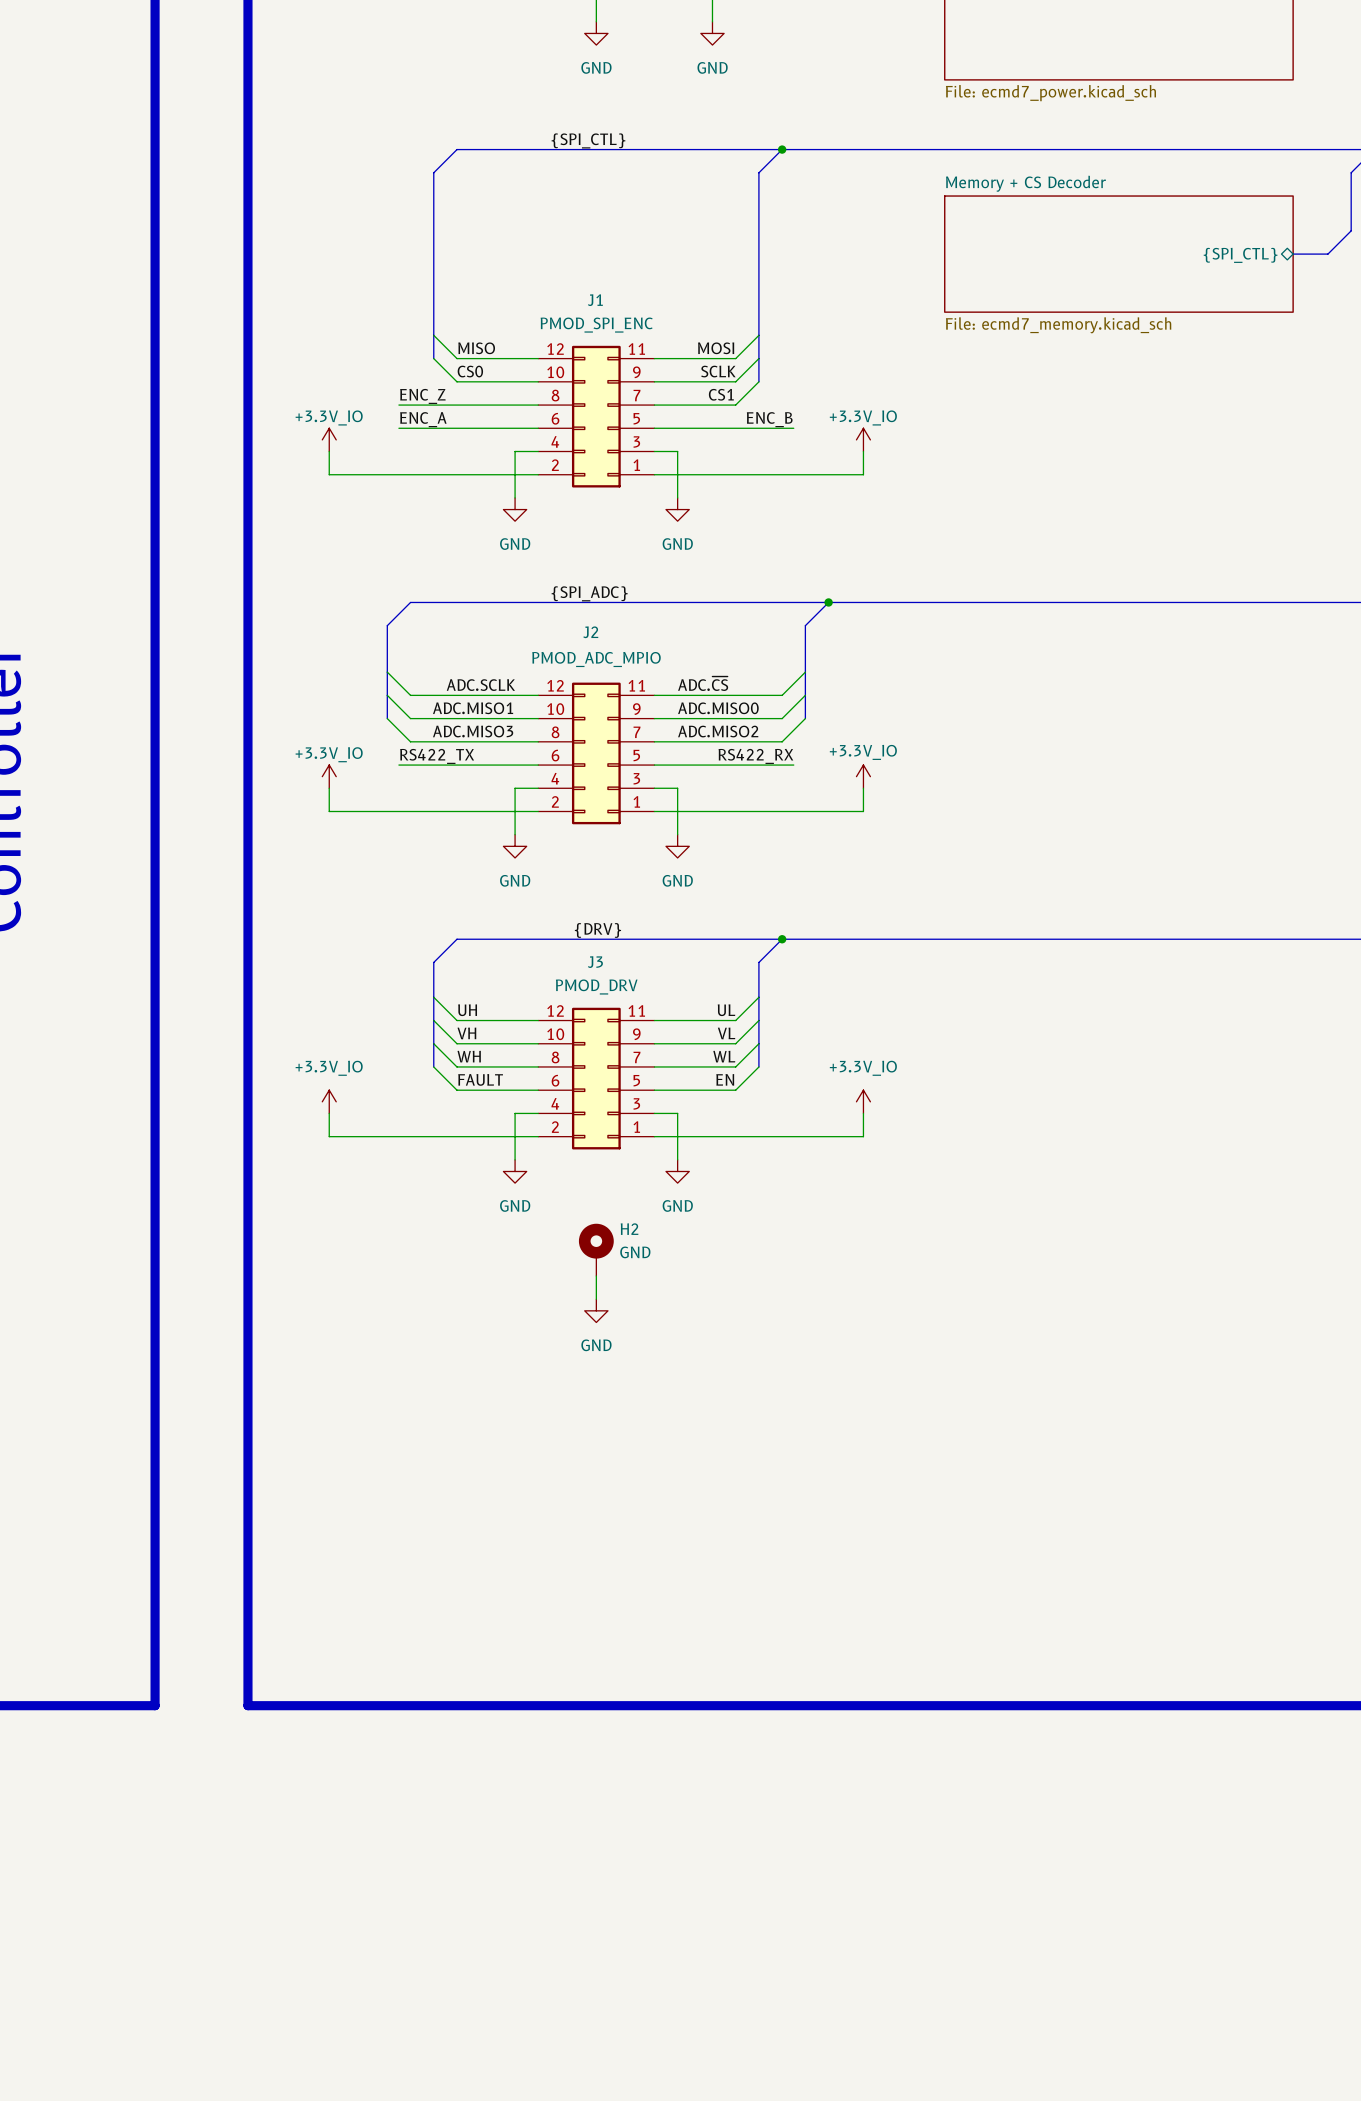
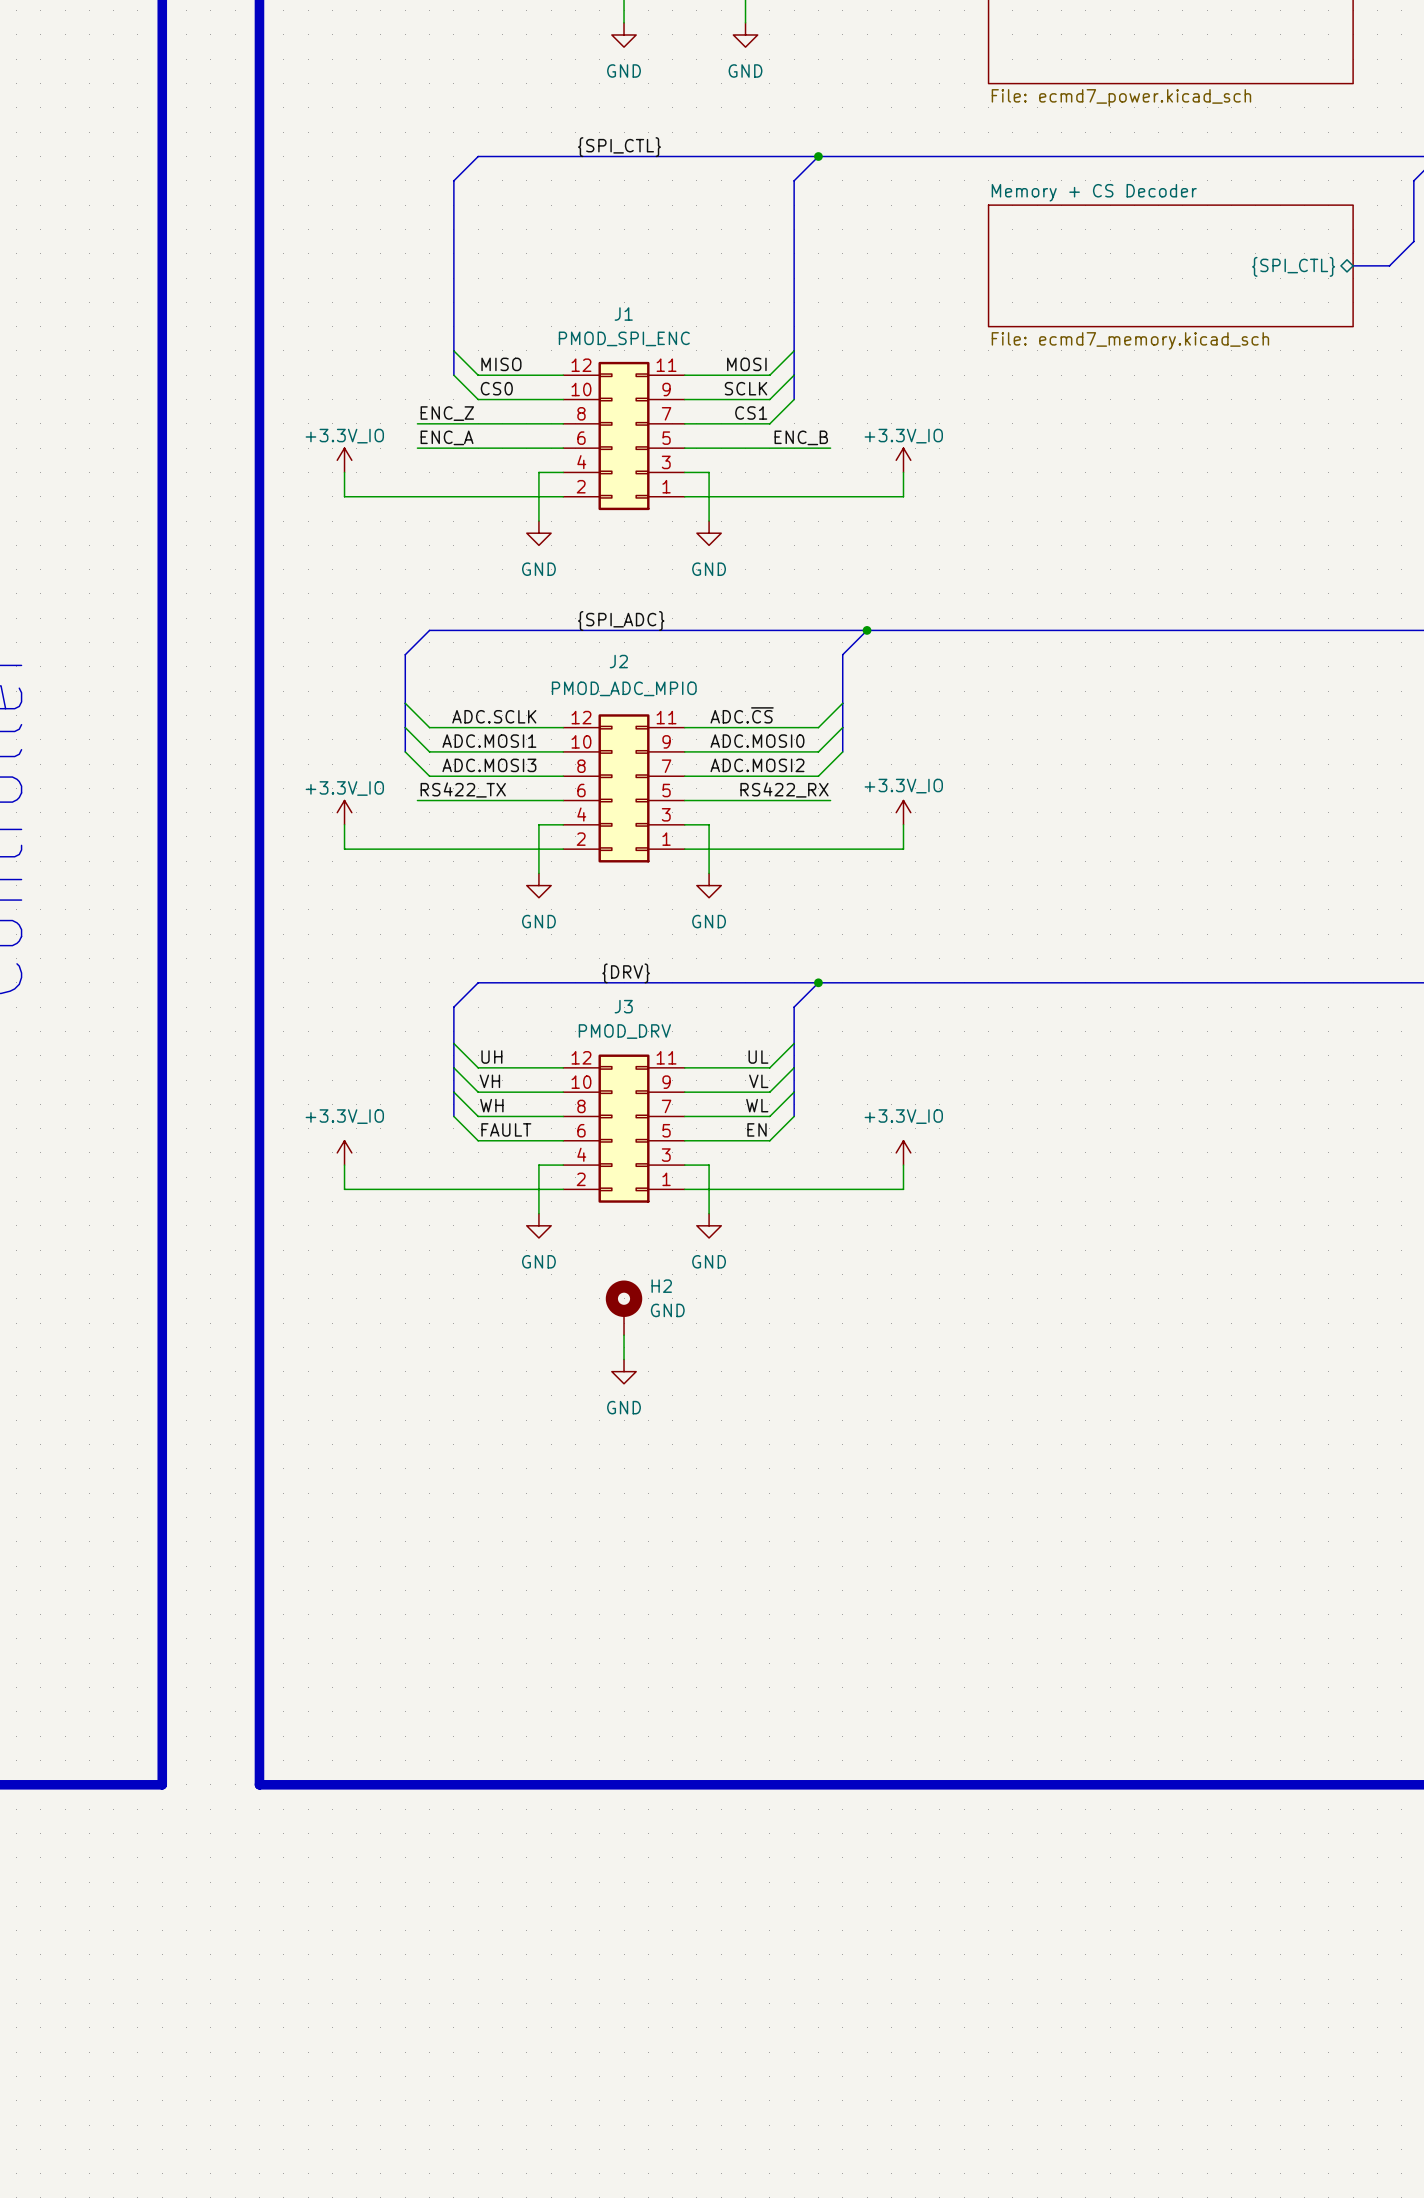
label: ADC.MISO1 (473, 708) -> ADC.MOSI1 (489, 741)
label: ADC.MISO0 (718, 708) -> ADC.MOSI0 (757, 741)
label: ADC.MISO3 (473, 731) -> ADC.MOSI3 (489, 765)
label: ADC.MISO2 (718, 731) -> ADC.MOSI2 (757, 765)

